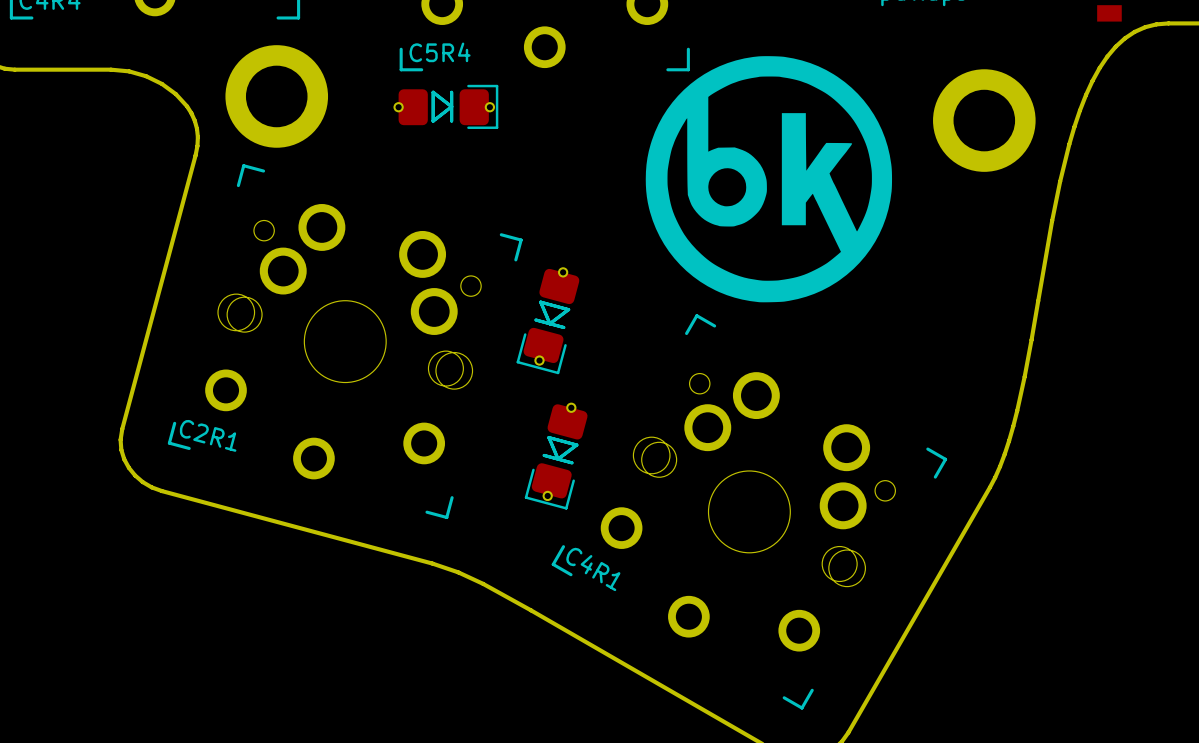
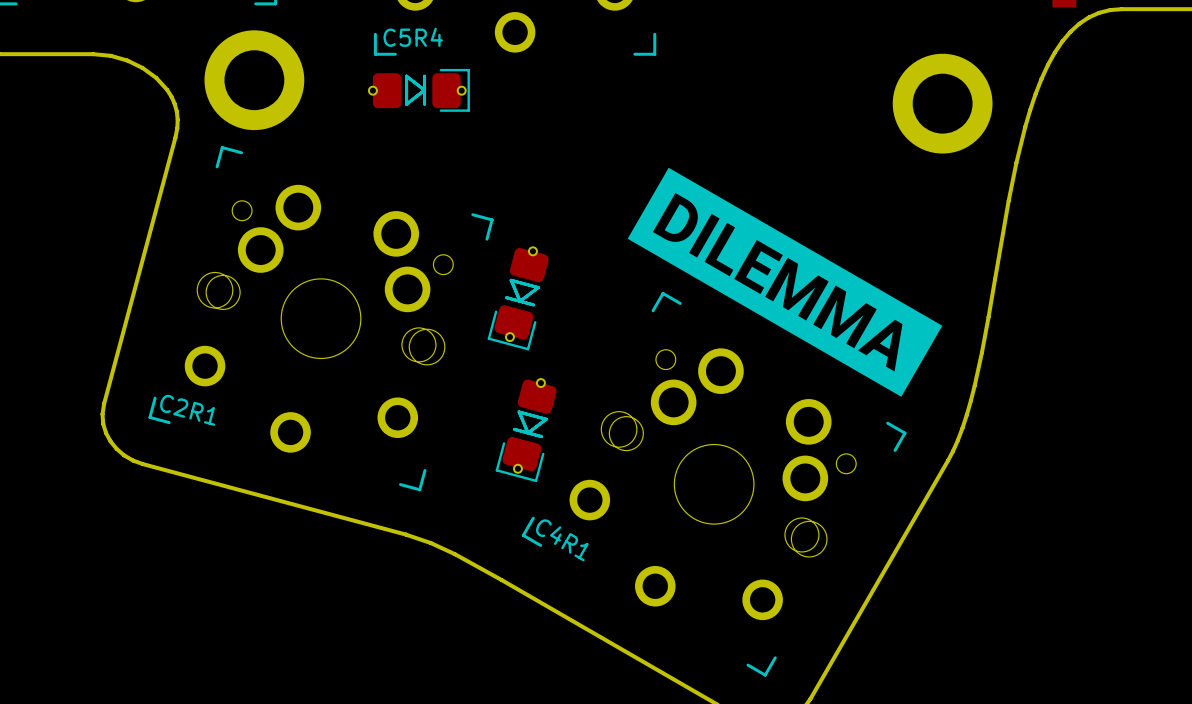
drawing: [645, 56, 893, 303] -> none
drawing: none -> [627, 167, 943, 397]

